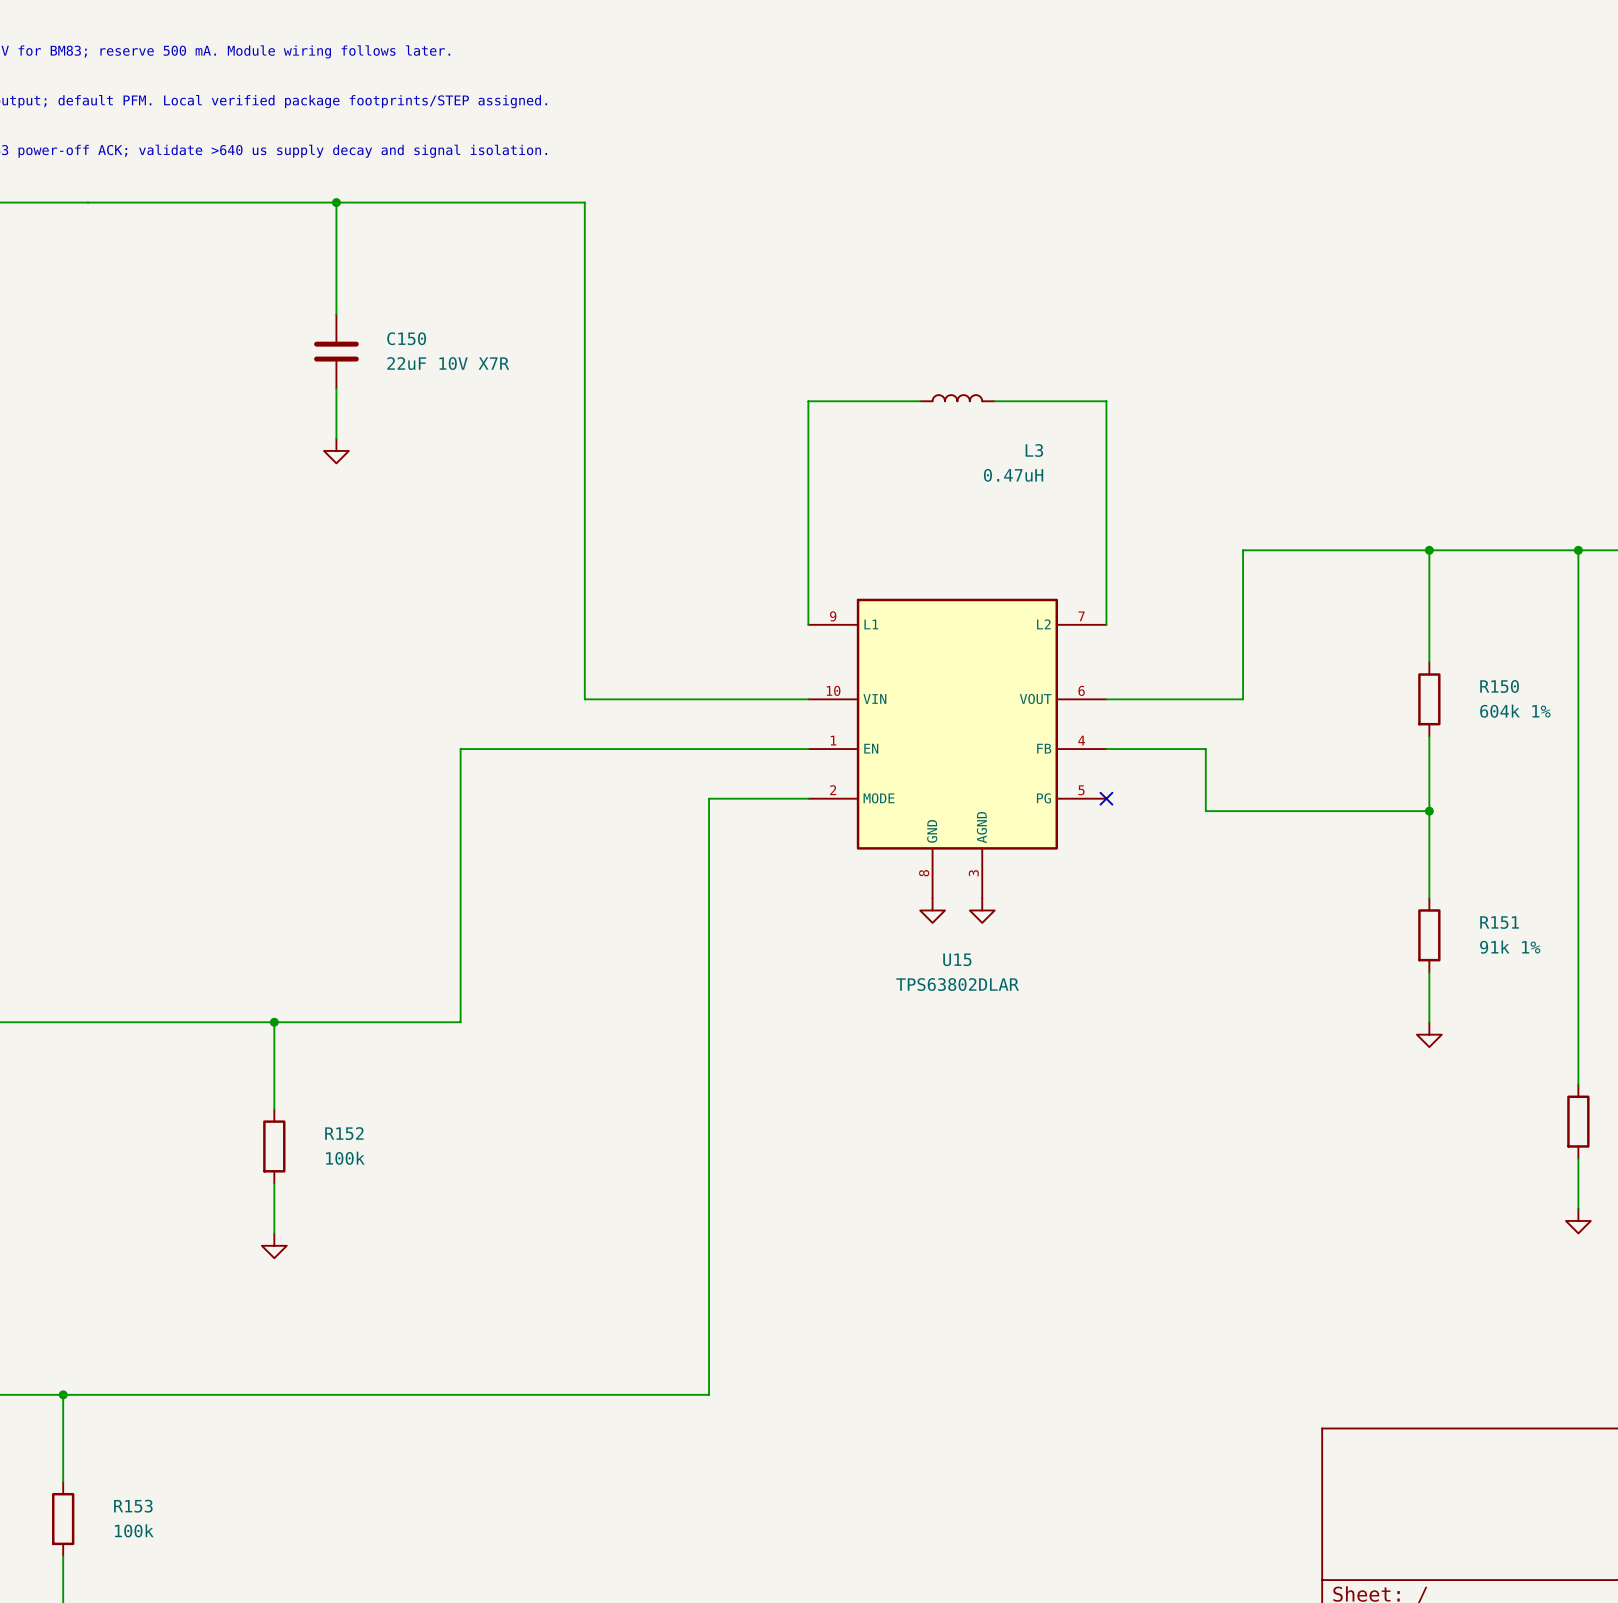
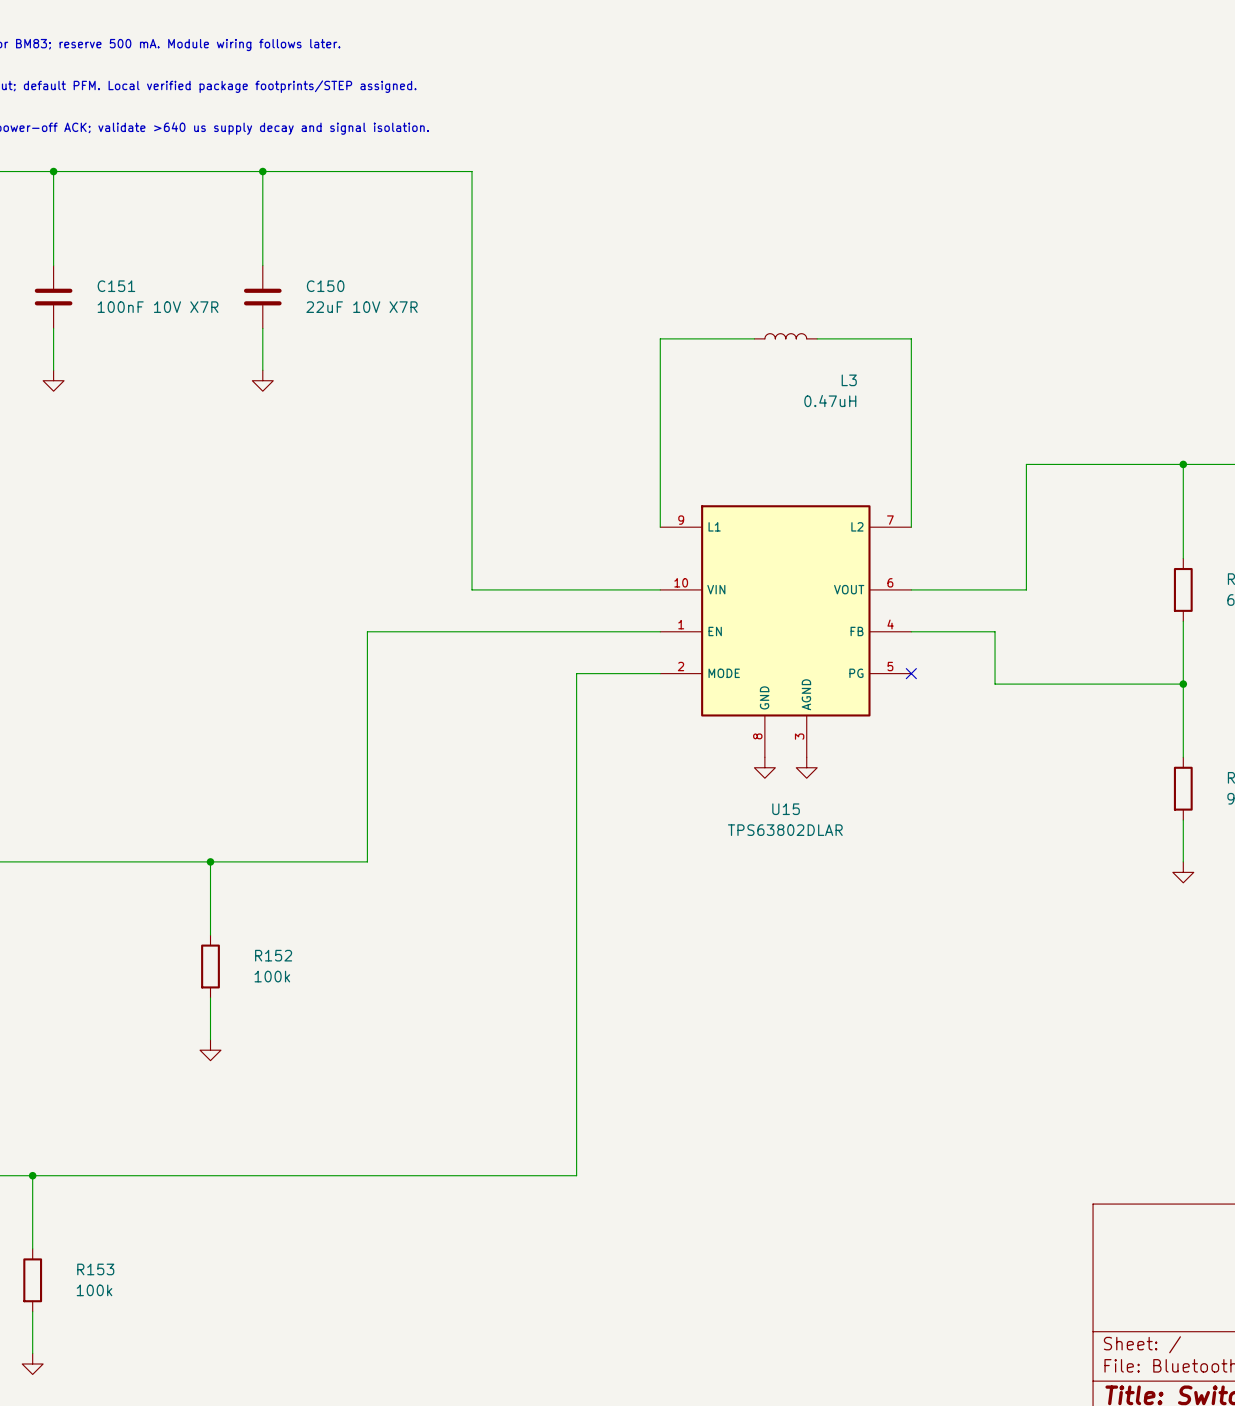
wire: none -> (53, 171) (53, 265)
junction: none -> (53, 171)
C151: none -> 100nF 10V X7R (53, 297)
wire: none -> (53, 328) (53, 370)
power symbol: none -> (53, 380)

